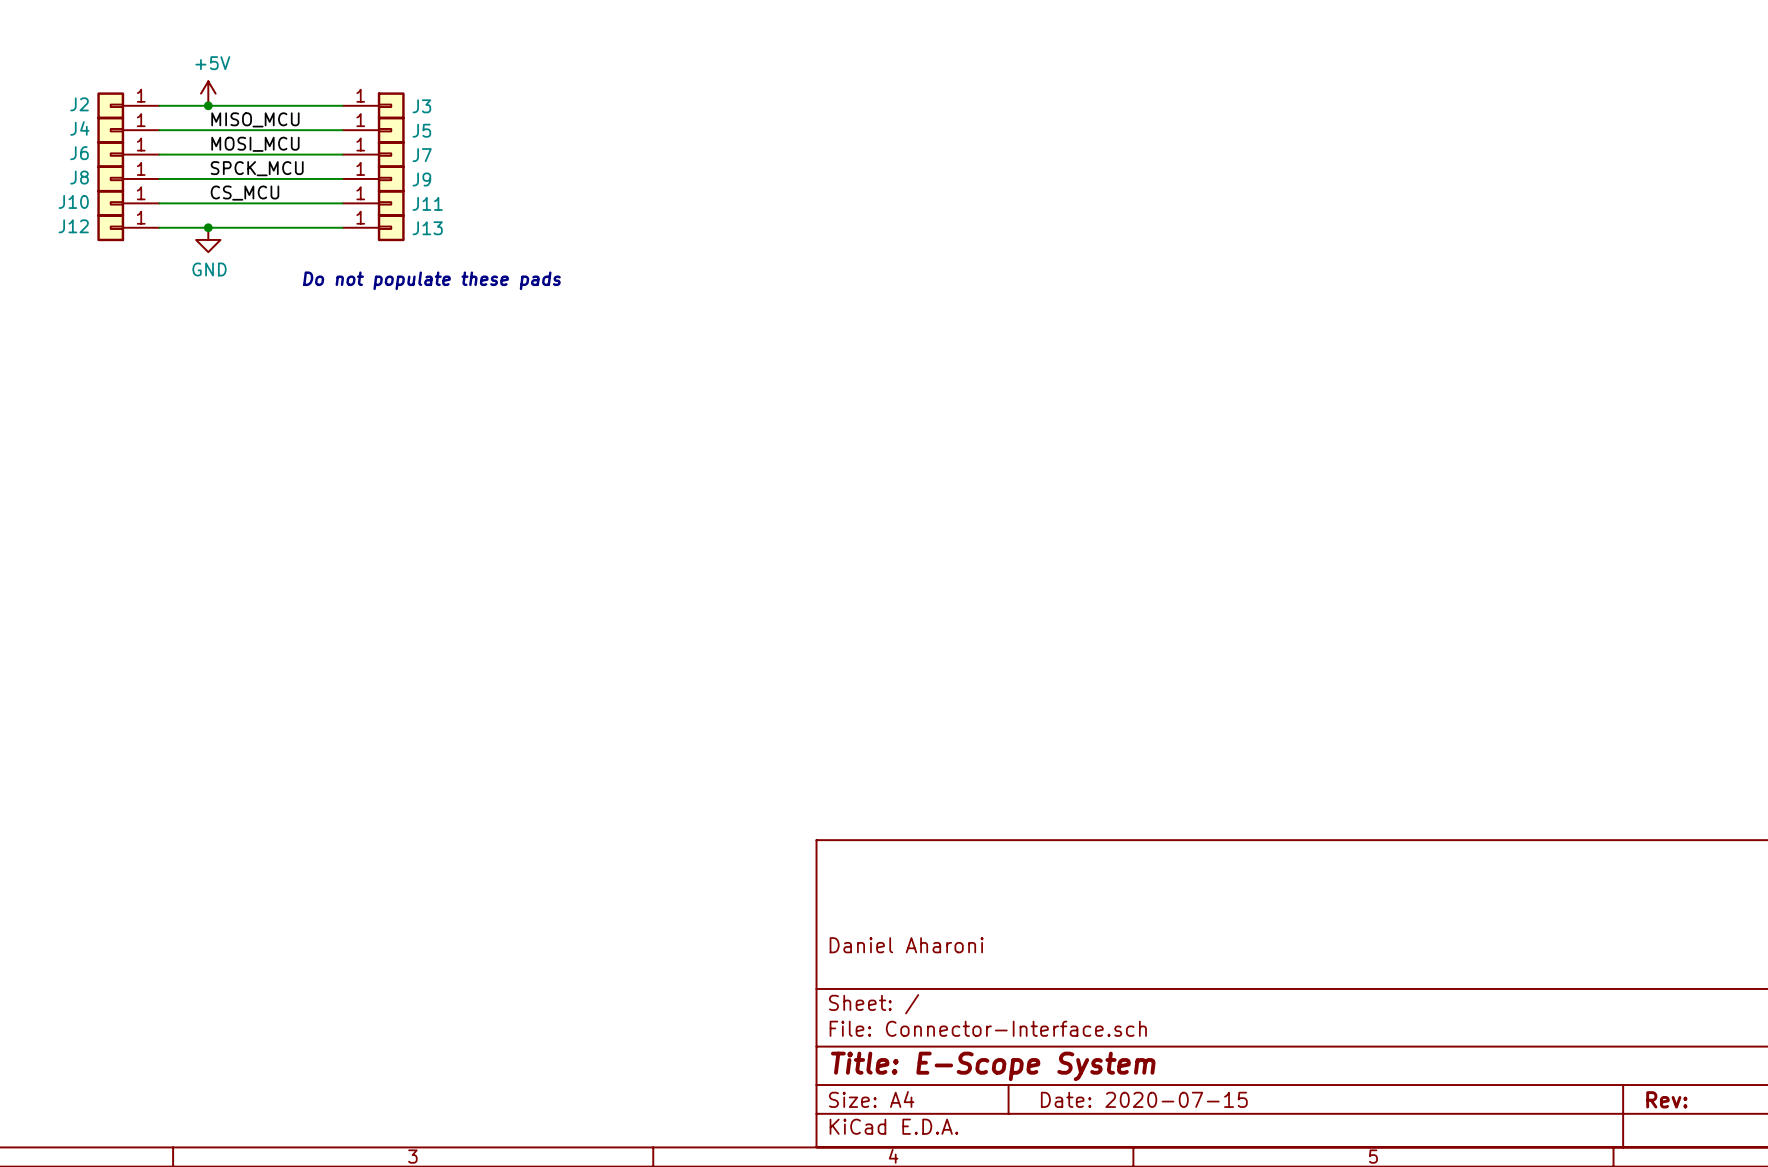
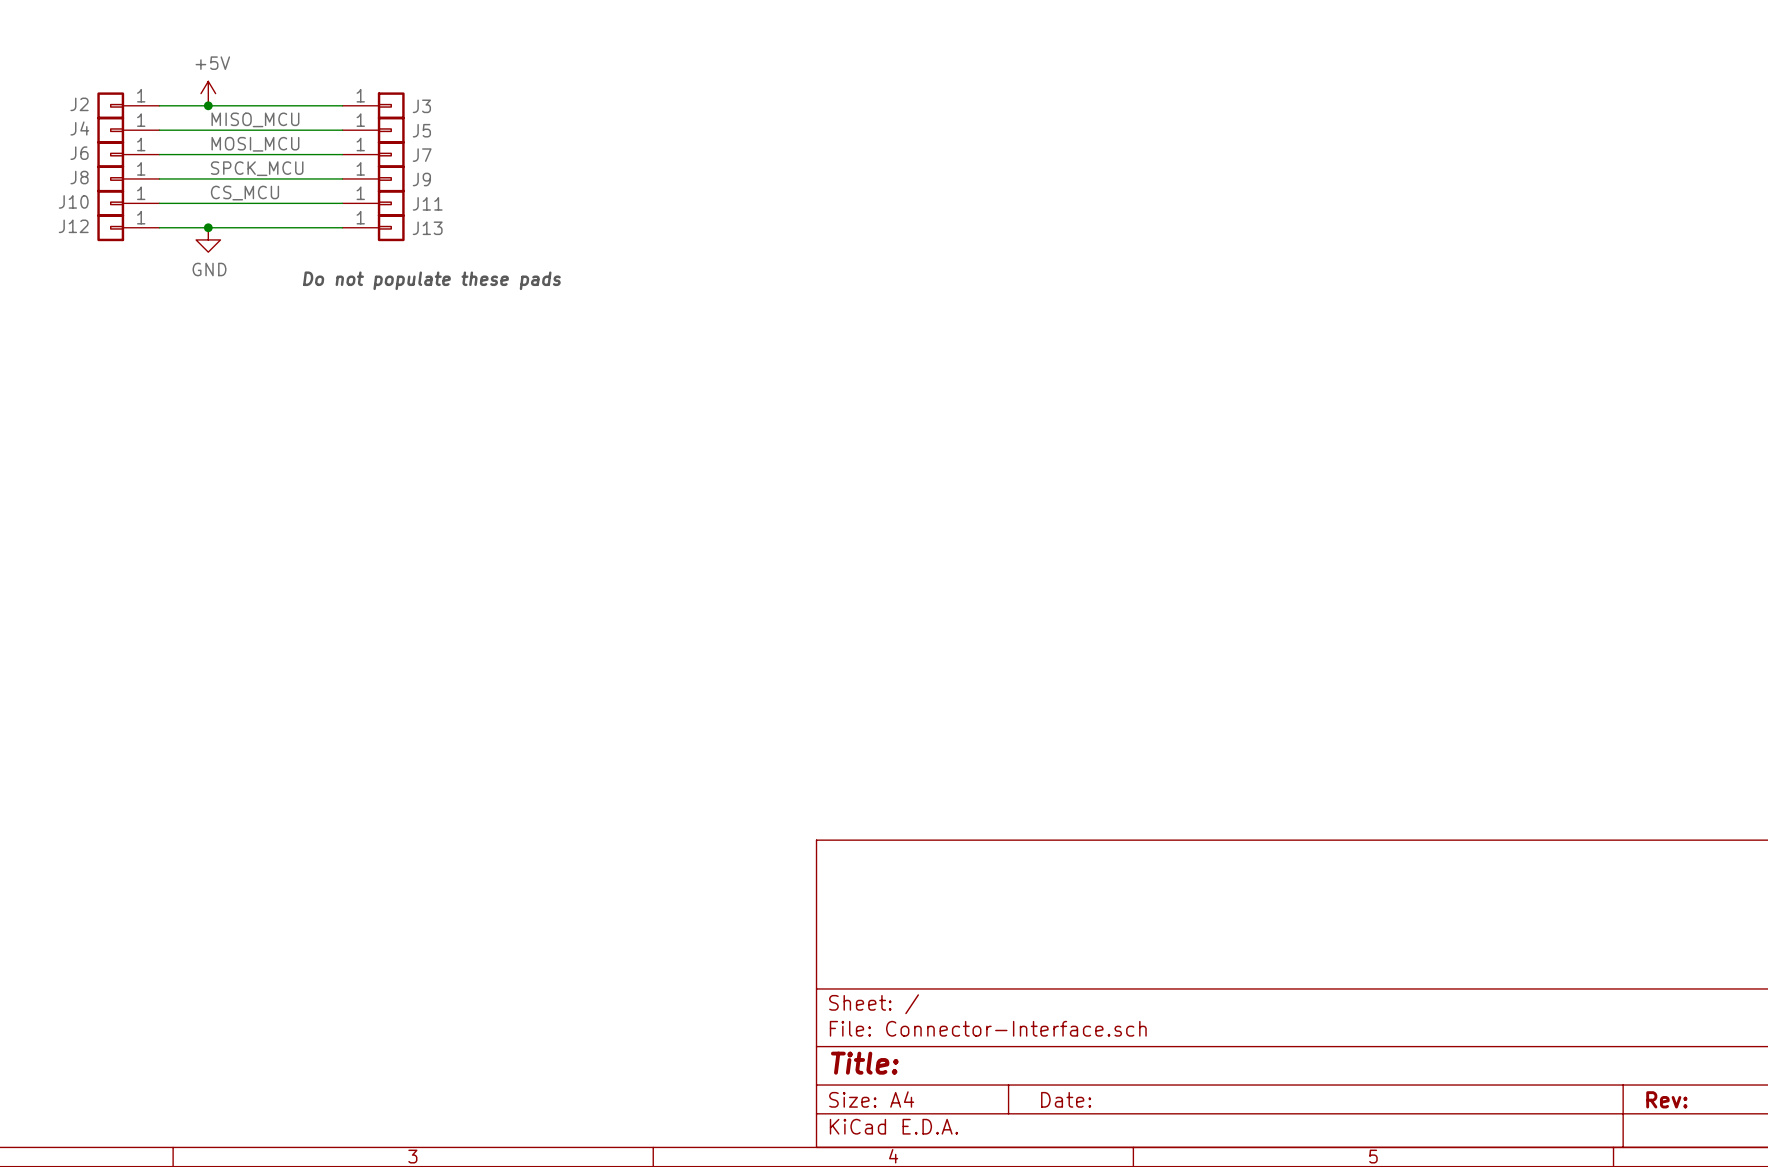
title block: Daniel Aharoni (906, 945) -> none
title block: Title: E-Scope System (993, 1066) -> Title: (864, 1063)
title block: Date: 2020-07-15 (1144, 1099) -> Date: (1066, 1099)

